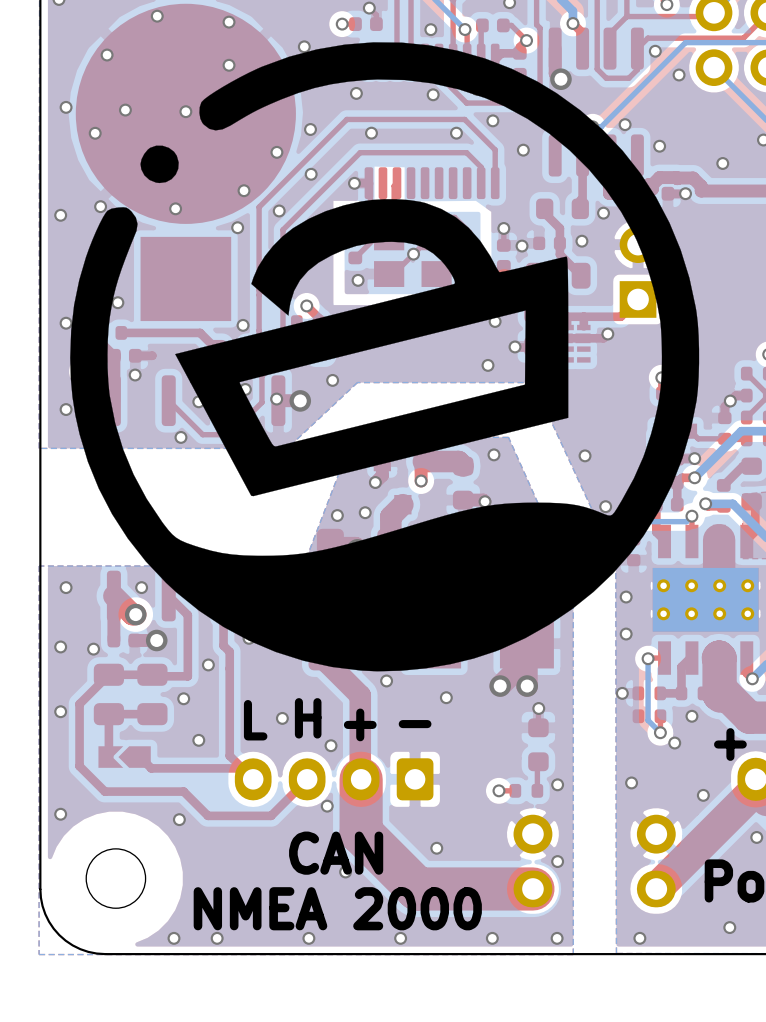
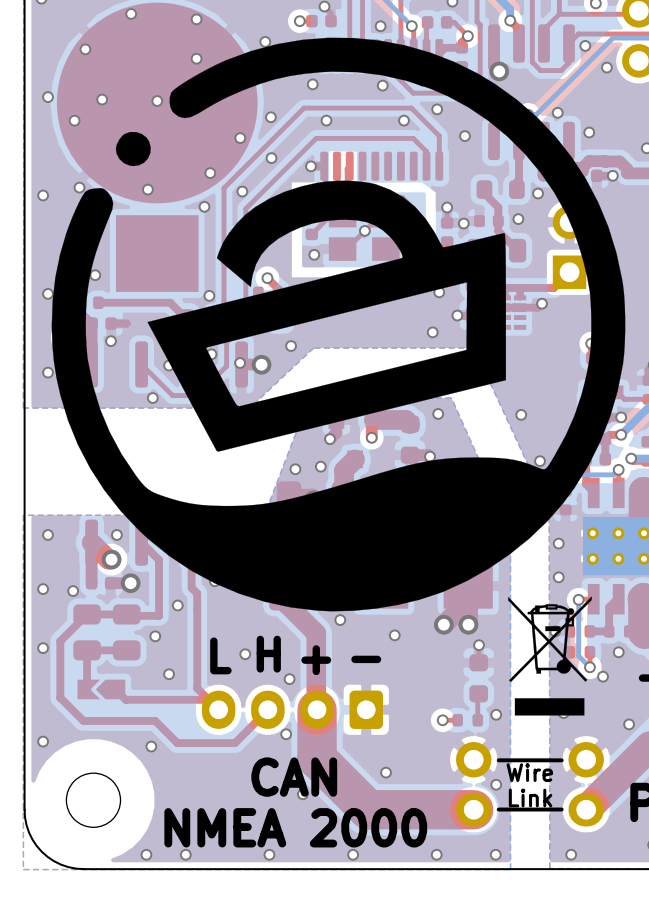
drawing: none -> [508, 596, 592, 716]
line: none -> (561, 760) (498, 760)
text: none -> Wire (529, 772)
text: none -> Link (530, 797)
line: none -> (561, 809) (498, 809)

